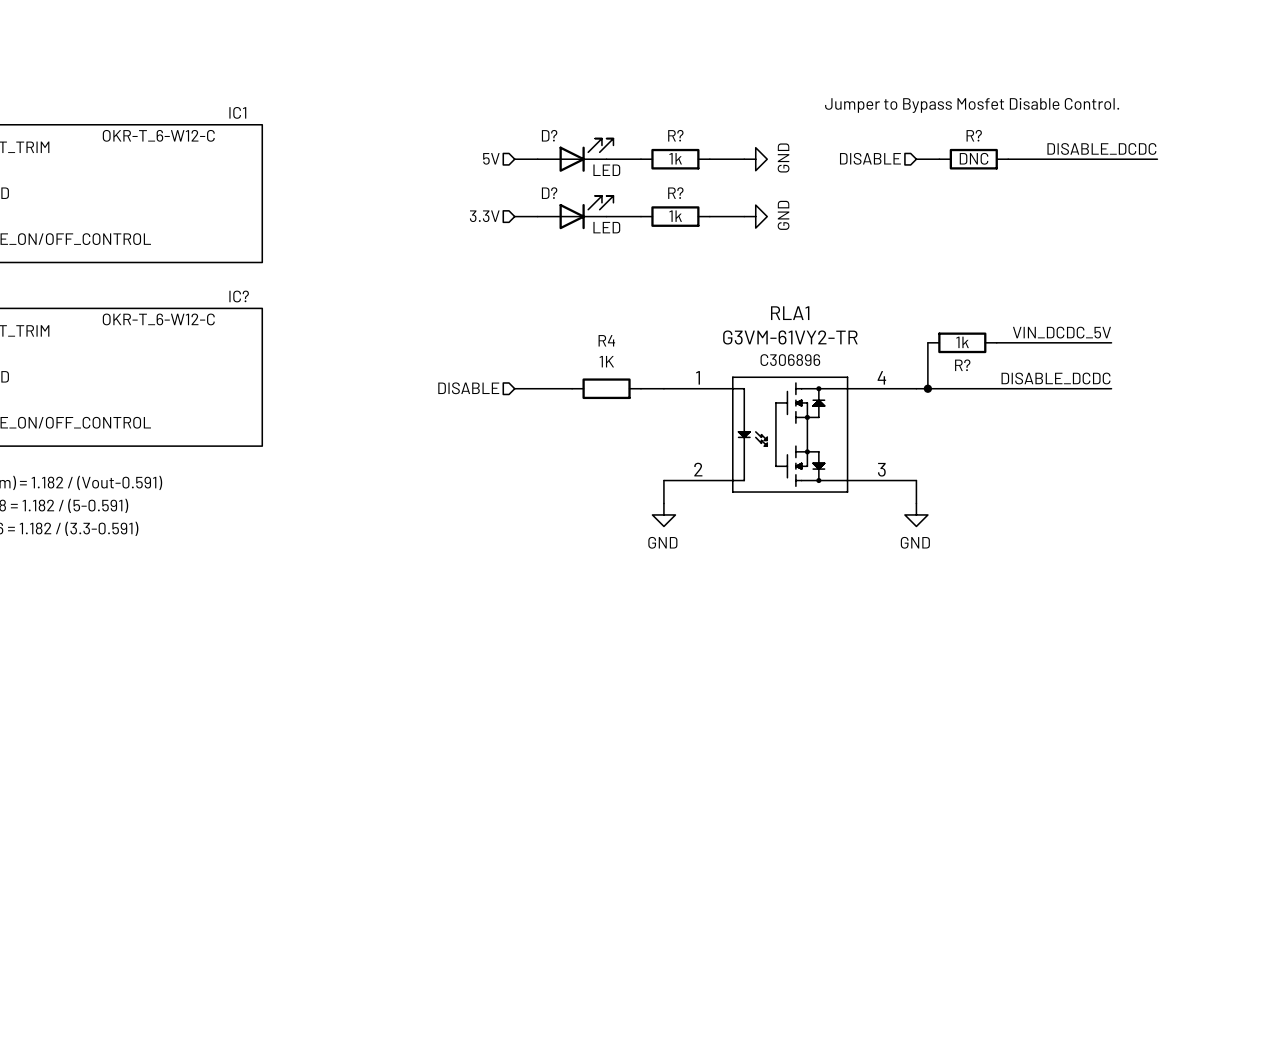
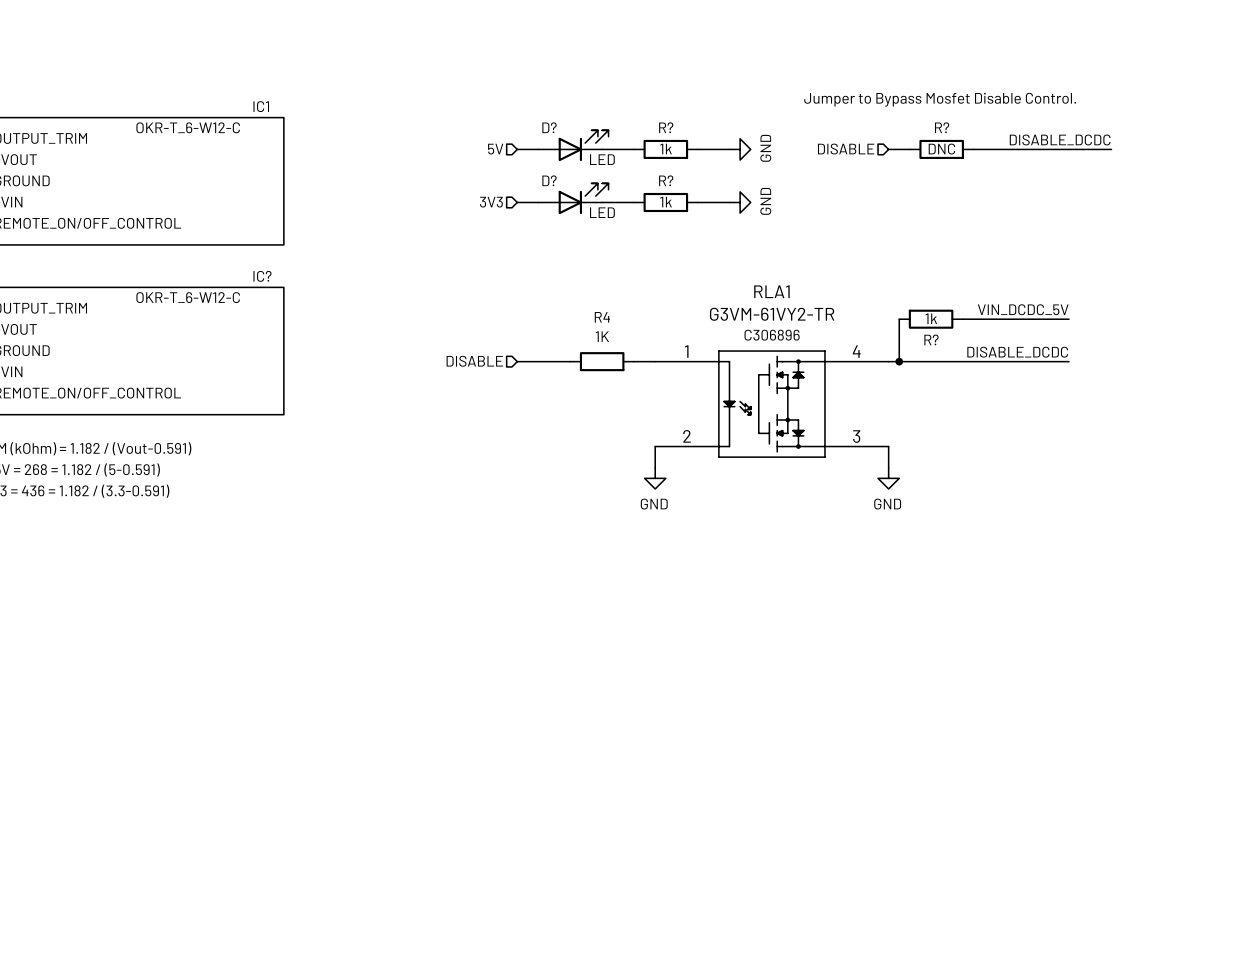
hierarchical label: 3.3V (484, 216) -> 3V3 (491, 202)

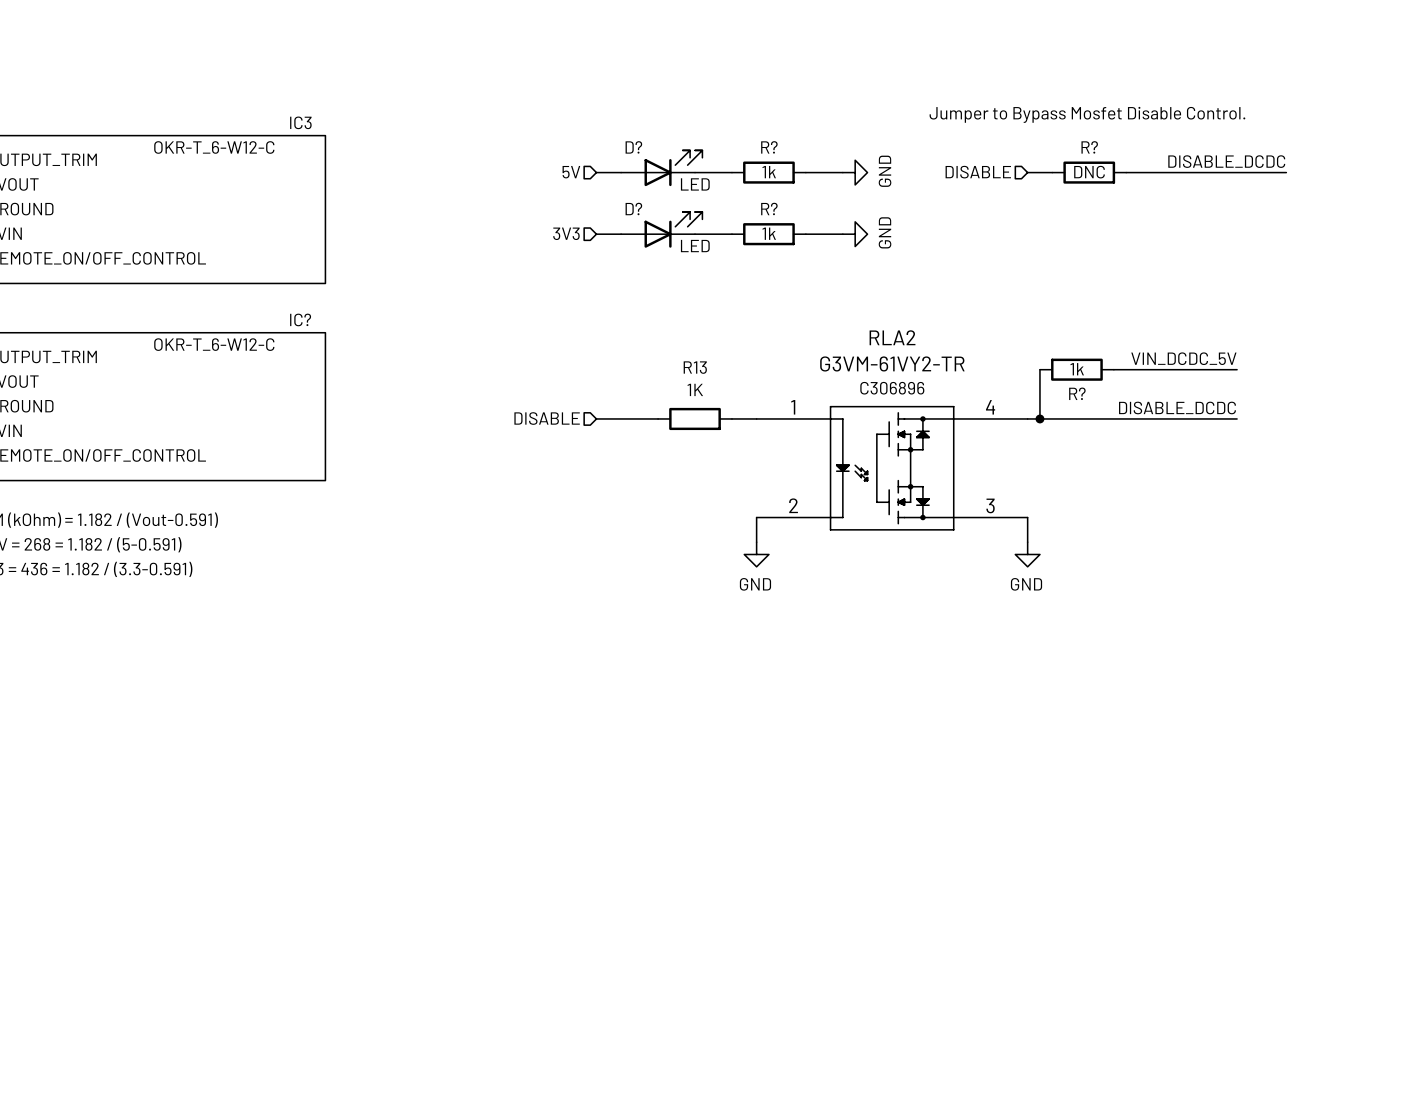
IC1 name: IC1 (261, 106) -> IC3 (300, 122)
RLA1 name: RLA1 (771, 291) -> RLA2 (892, 337)
R4 name: R4 (602, 317) -> R13 (695, 367)

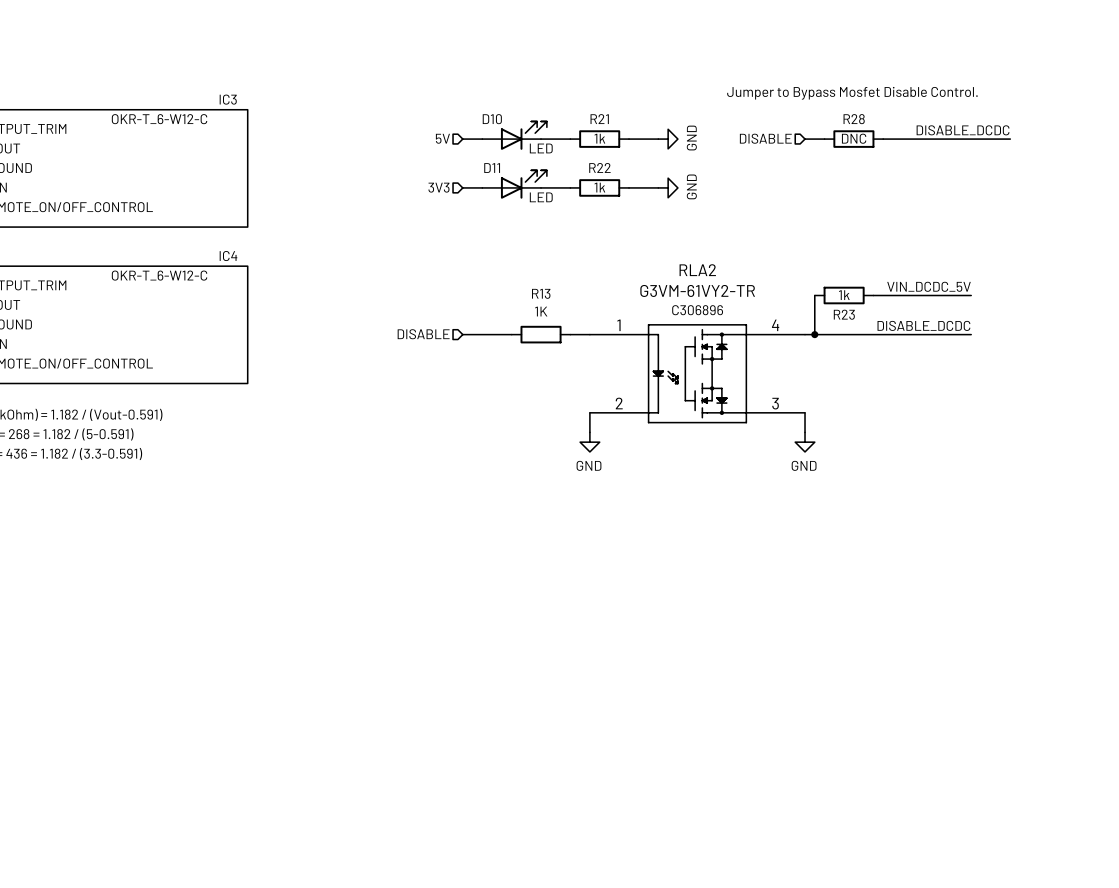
D? name: D? (633, 147) -> D10 (492, 119)
R? name: R? (769, 147) -> R21 (599, 119)
R? name: R? (1089, 147) -> R28 (854, 119)
D? name: D? (633, 209) -> D11 (492, 168)
R? name: R? (769, 209) -> R22 (599, 167)
IC? name: IC? (300, 319) -> IC4 (228, 256)
R? name: R? (1077, 393) -> R23 (844, 314)

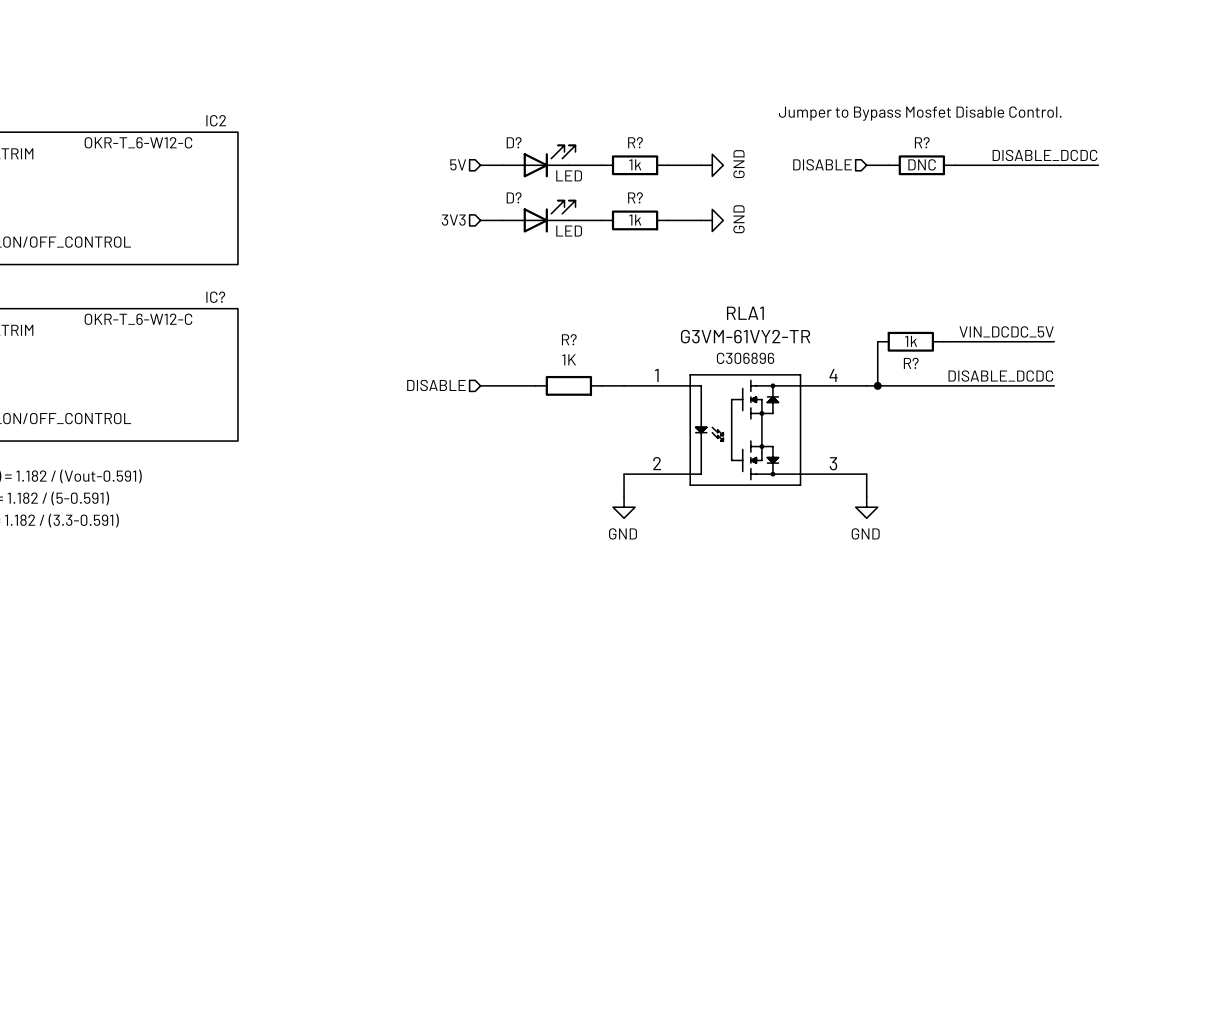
IC3 name: IC3 (228, 99) -> IC2 (216, 120)
D10 name: D10 (492, 119) -> D? (514, 142)
R21 name: R21 (599, 119) -> R? (635, 142)
R28 name: R28 (854, 119) -> R? (922, 142)
R22 name: R22 (599, 167) -> R? (635, 197)
D11 name: D11 (492, 168) -> D? (514, 197)
IC4 name: IC4 (228, 256) -> IC? (215, 297)
RLA2 name: RLA2 (697, 270) -> RLA1 (745, 313)
R13 name: R13 (541, 293) -> R? (569, 339)
R23 name: R23 (844, 314) -> R? (911, 363)

